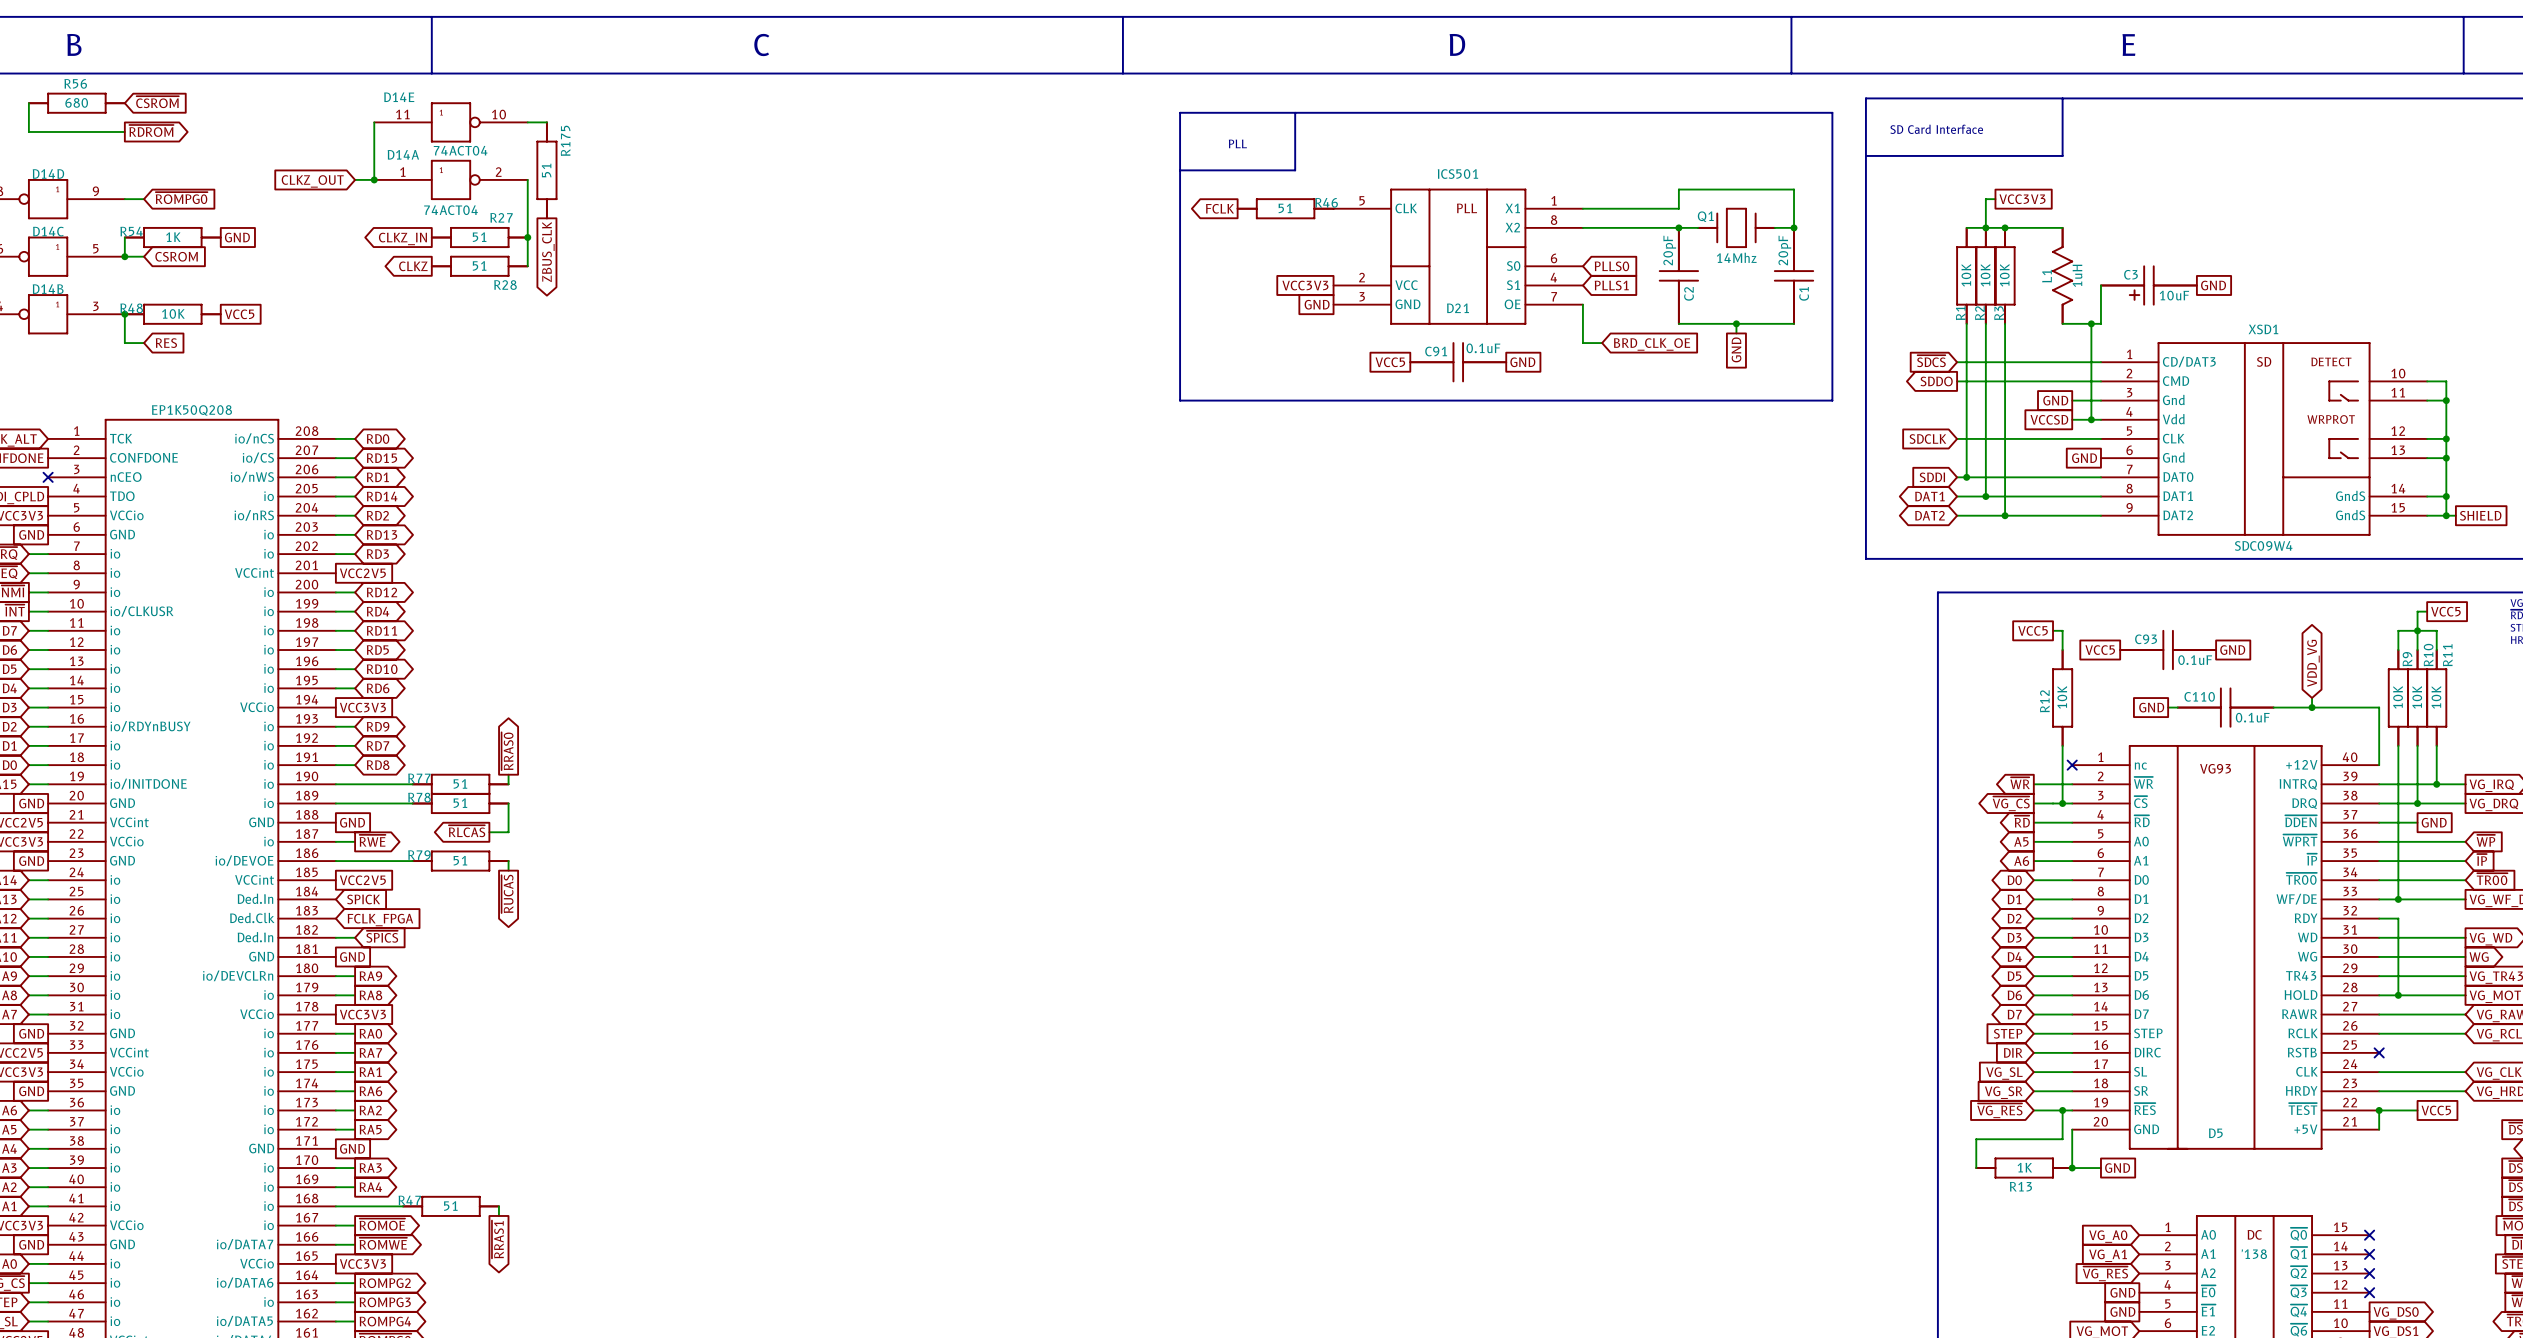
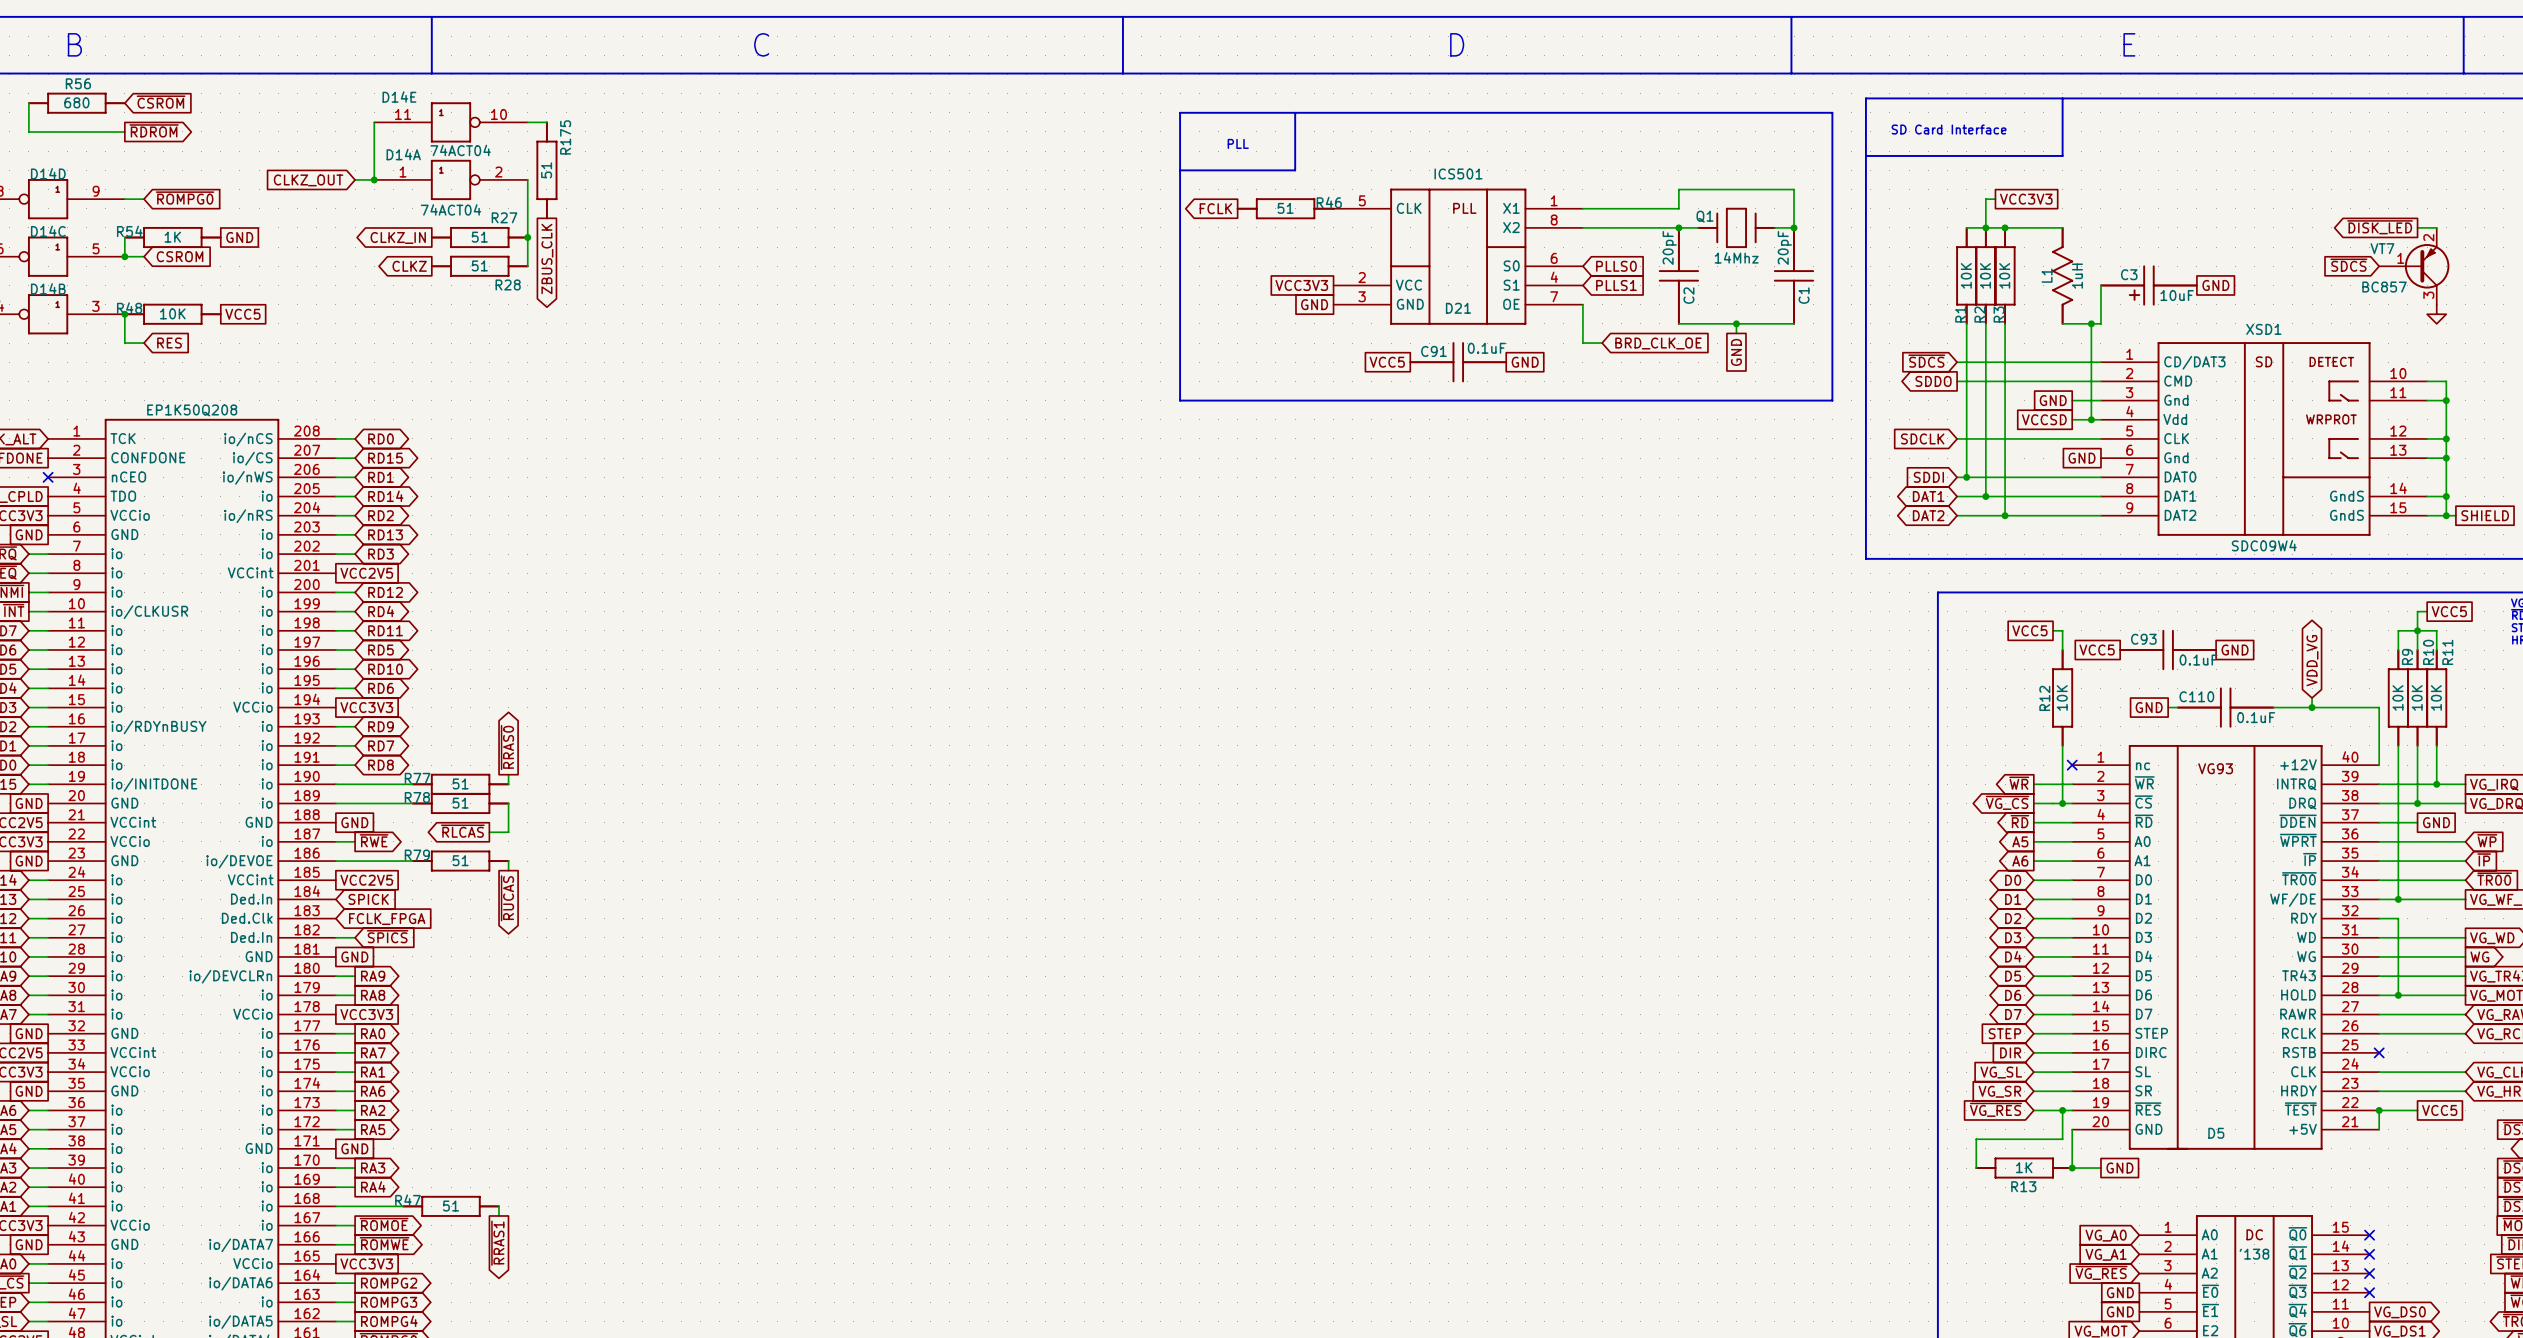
wire: none -> (2417, 227) (2436, 227)
global label: none -> ~{DISK_LED} (2380, 227)
global label: none -> ~{SDCS} (2348, 265)
VT7: none -> BC857 (2414, 266)
power symbol: none -> (2436, 314)

